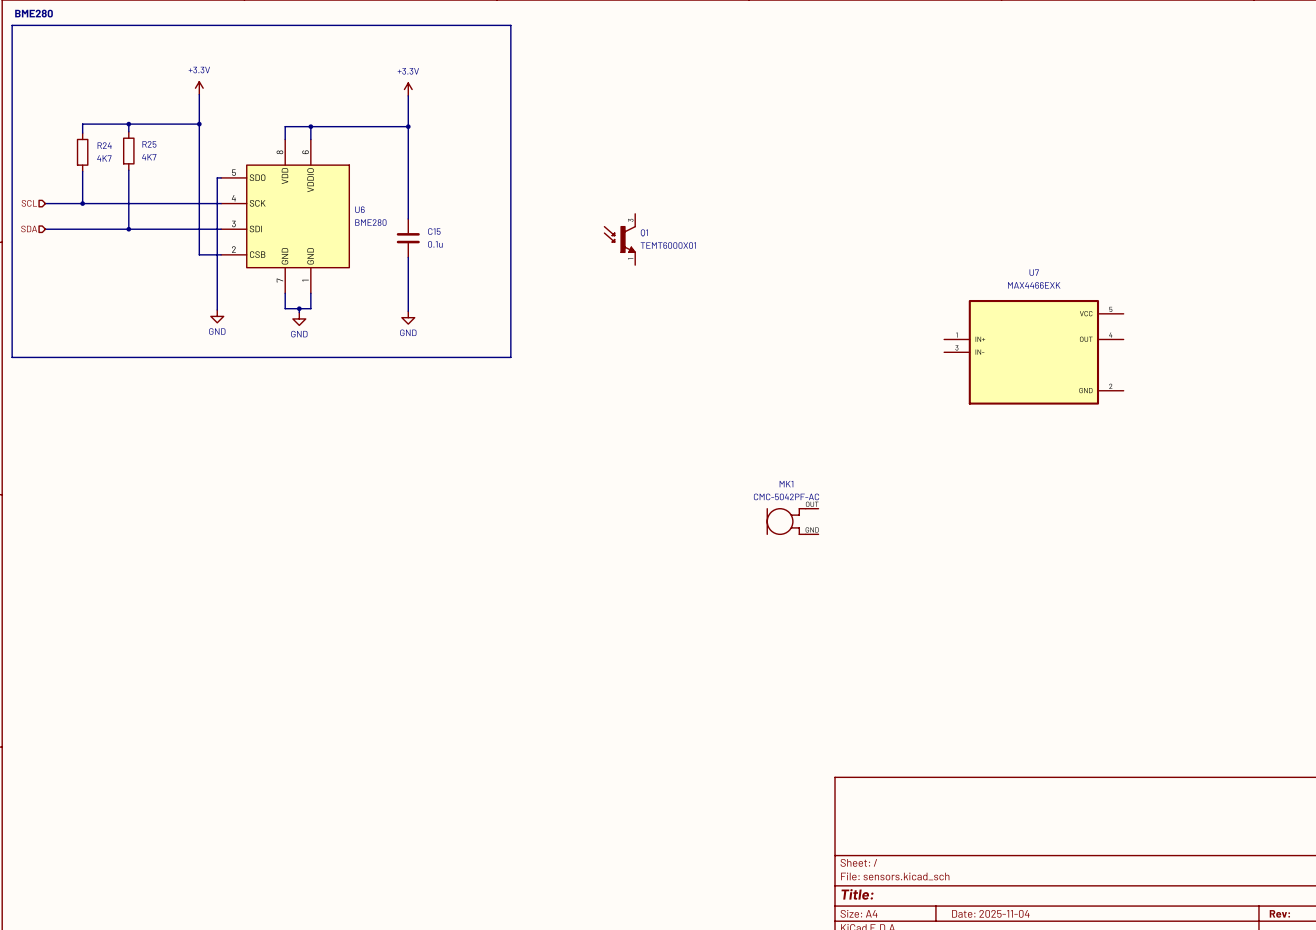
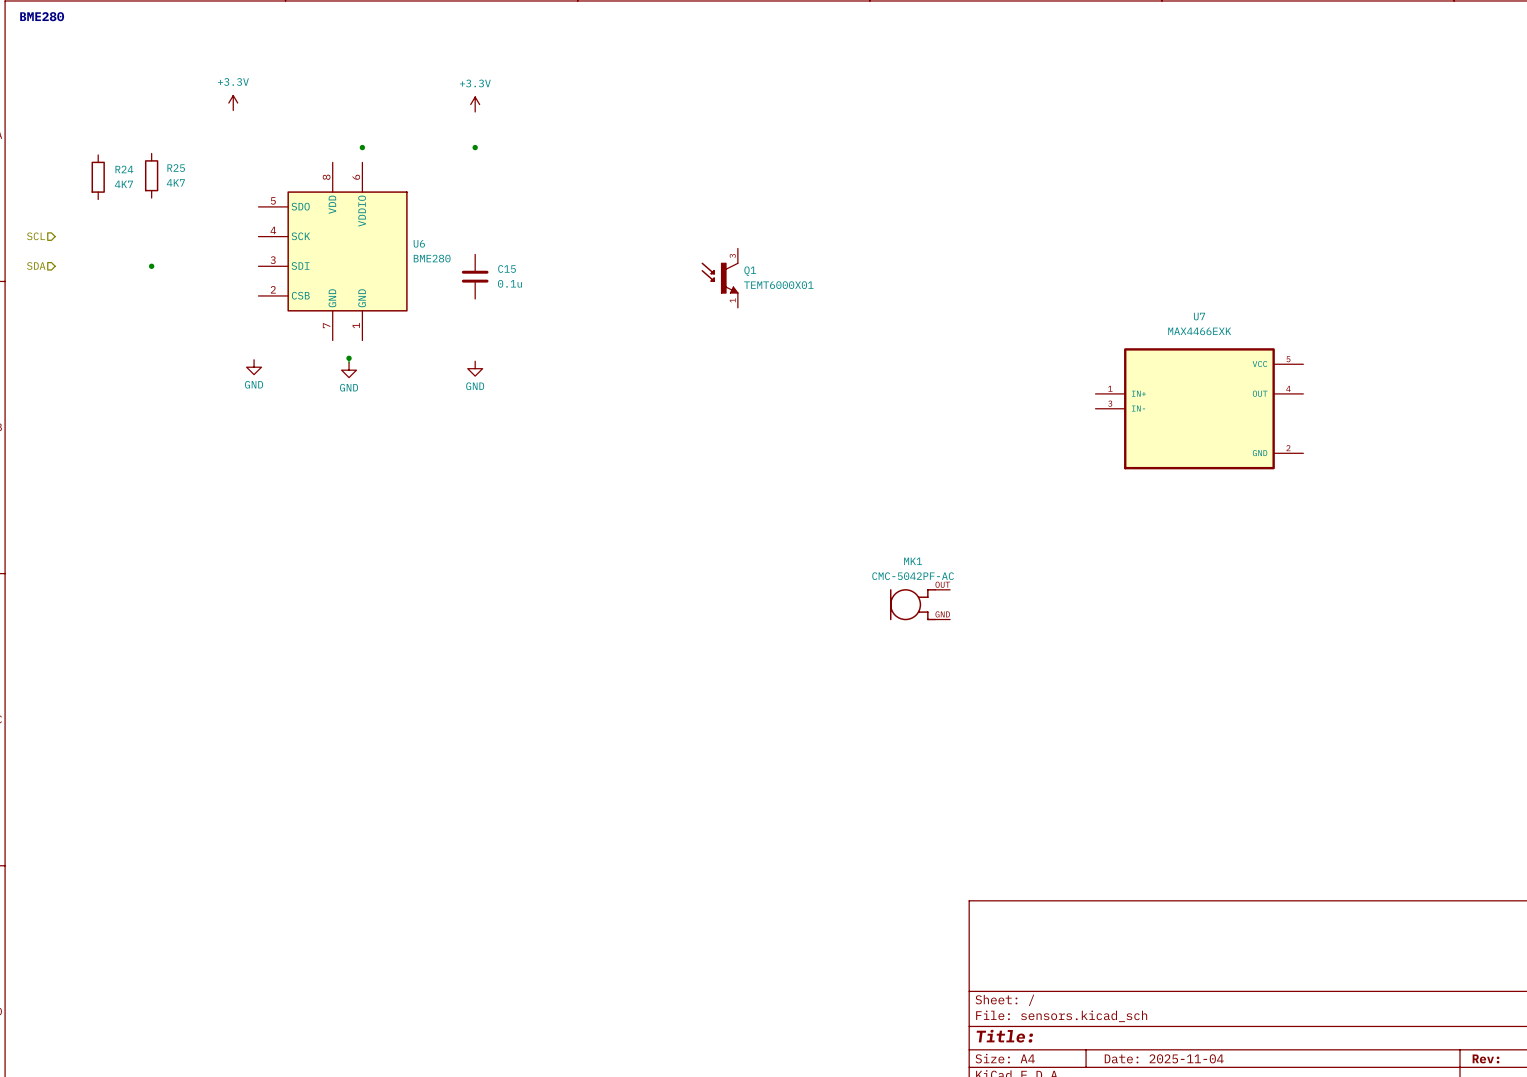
line: (12, 25) (510, 25) (510, 357) (12, 357) (12, 25) -> none
wire: (199, 94) (199, 254) (221, 254) -> none
wire: (408, 95) (408, 218) -> none
wire: (128, 124) (128, 131) -> none
junction: (128, 124) -> none
wire: (199, 124) (82, 124) (82, 133) -> none
junction: (199, 124) -> none
wire: (310, 126) (310, 139) -> none
wire: (408, 126) (285, 126) (285, 139) -> none
wire: (128, 170) (128, 229) -> none
wire: (82, 171) (82, 203) -> none
wire: (221, 177) (217, 177) (217, 309) -> none
wire: (45, 203) (221, 203) -> none
junction: (82, 203) -> none
wire: (45, 229) (221, 229) -> none
wire: (408, 257) (408, 311) -> none
wire: (285, 293) (285, 308) (310, 308) (310, 293) -> none

